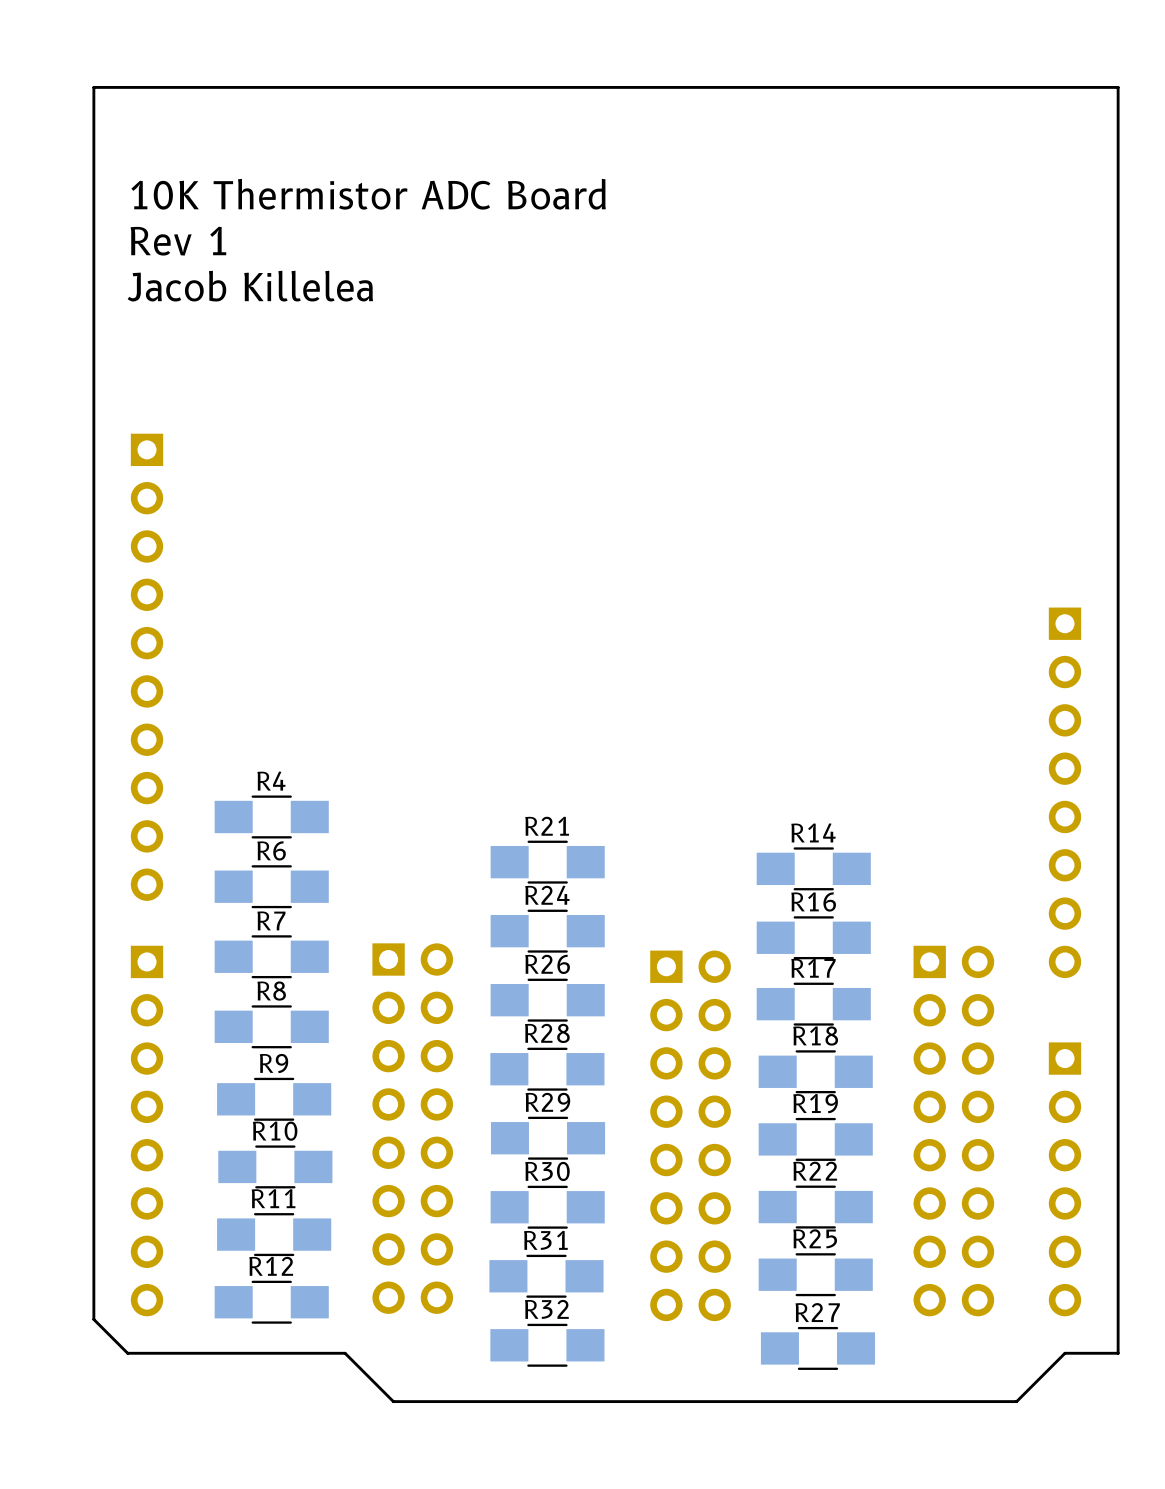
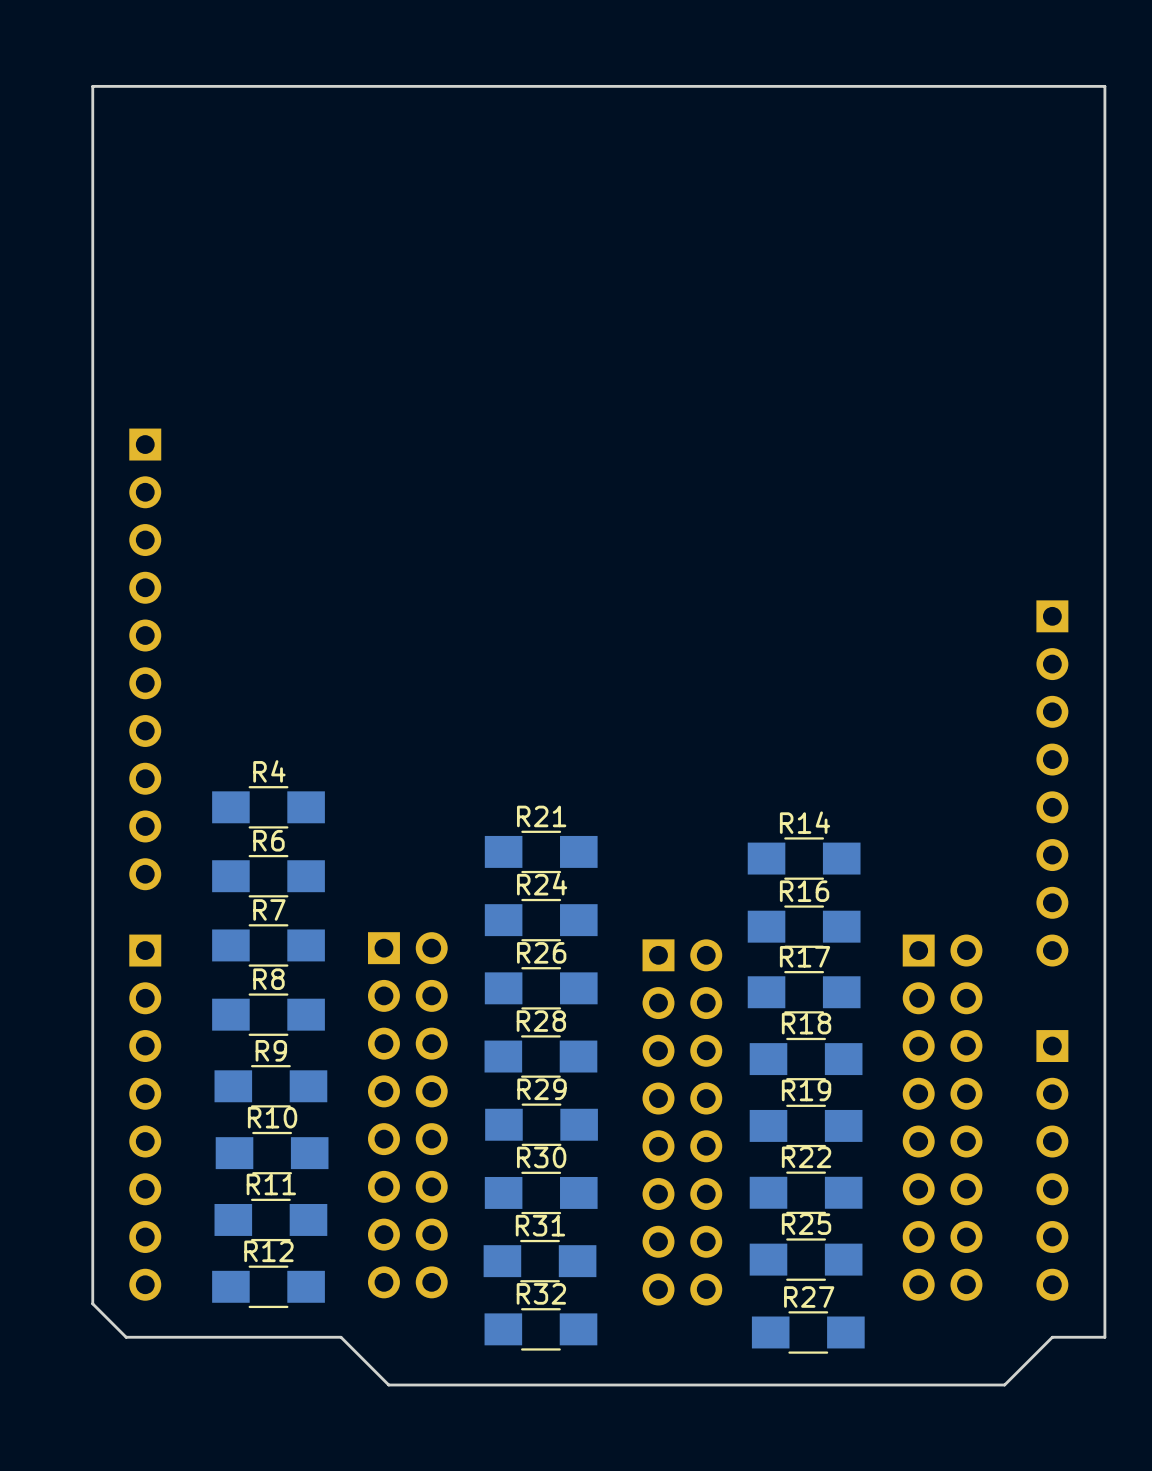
text: 10K Thermistor ADC Board (368, 194) -> none
text: Rev 1 (178, 241) -> none
text: Jacob Killelea (250, 286) -> none

